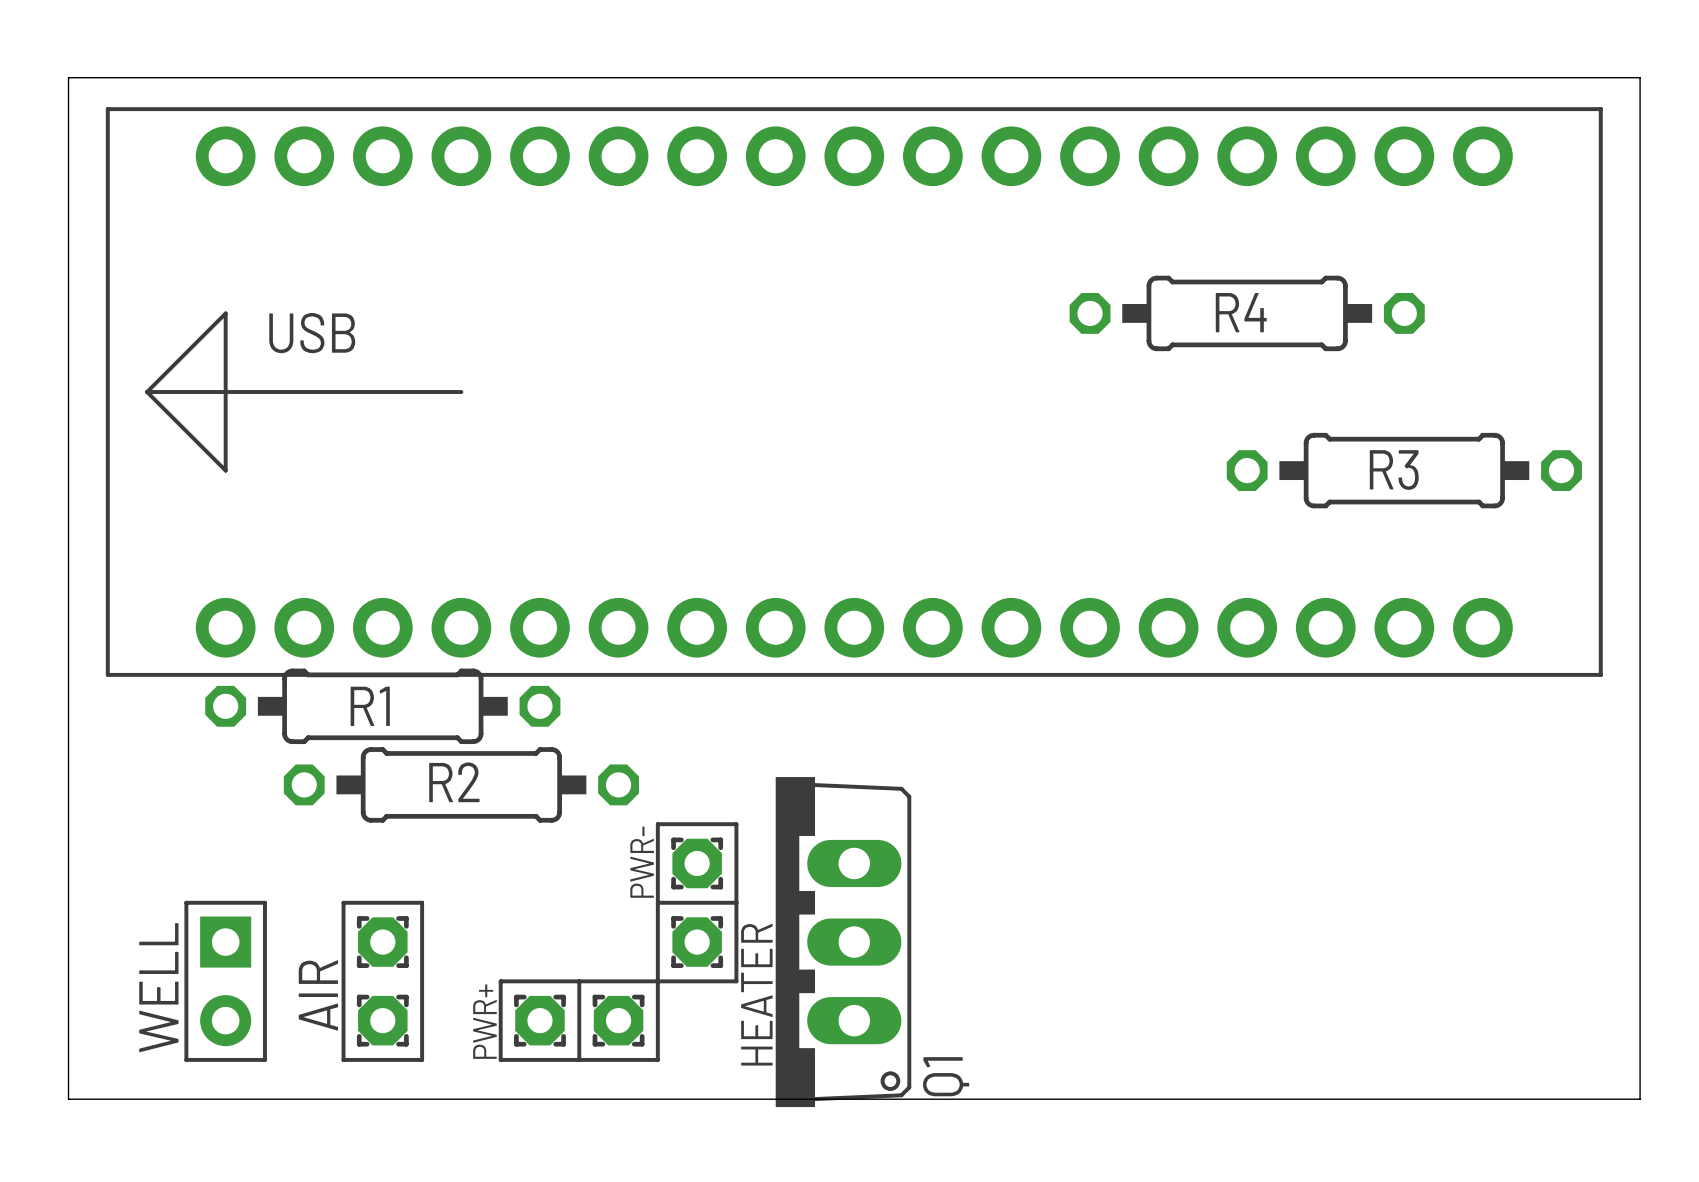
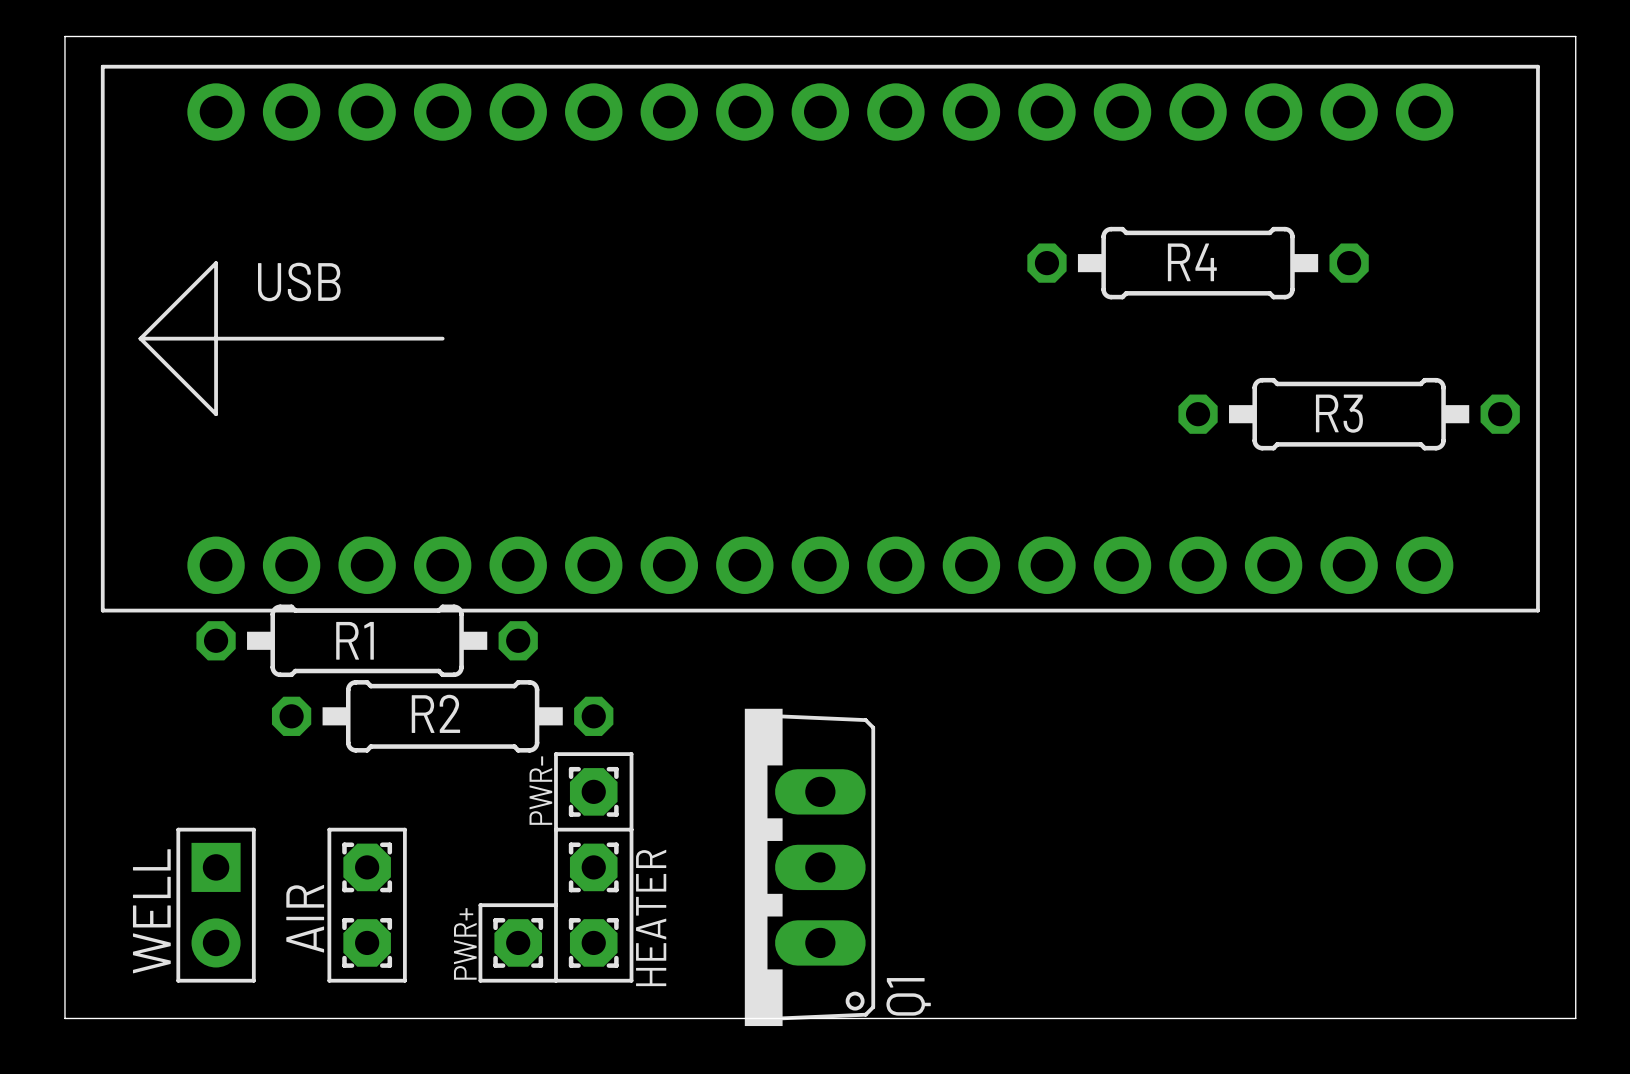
line: (657, 824) (736, 824) (736, 981) (579, 981) -> (631, 754) (555, 754) (555, 905)
text position: PWR- (642, 862) -> PWR- (540, 790)
part: none -> (593, 791)
part: (697, 863) -> none
line: (657, 902) (736, 902) -> (631, 829) (555, 829)
part: none -> (593, 867)
part: (697, 942) -> none
text position: HEATER (756, 994) -> HEATER (651, 917)

